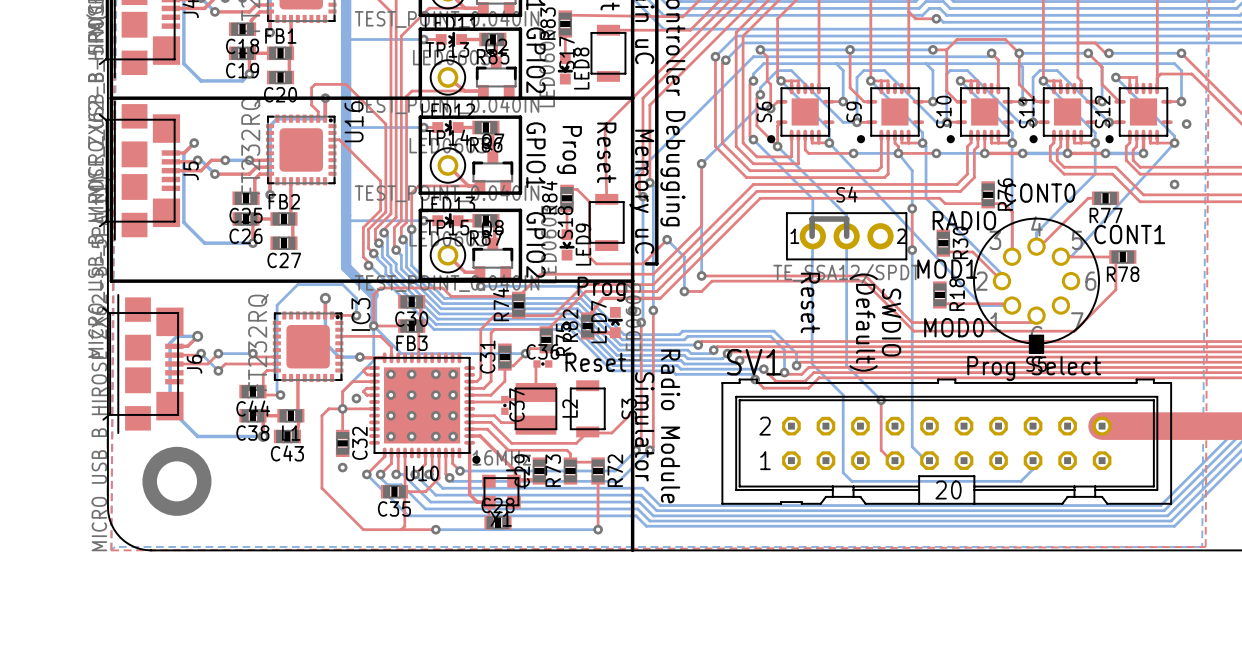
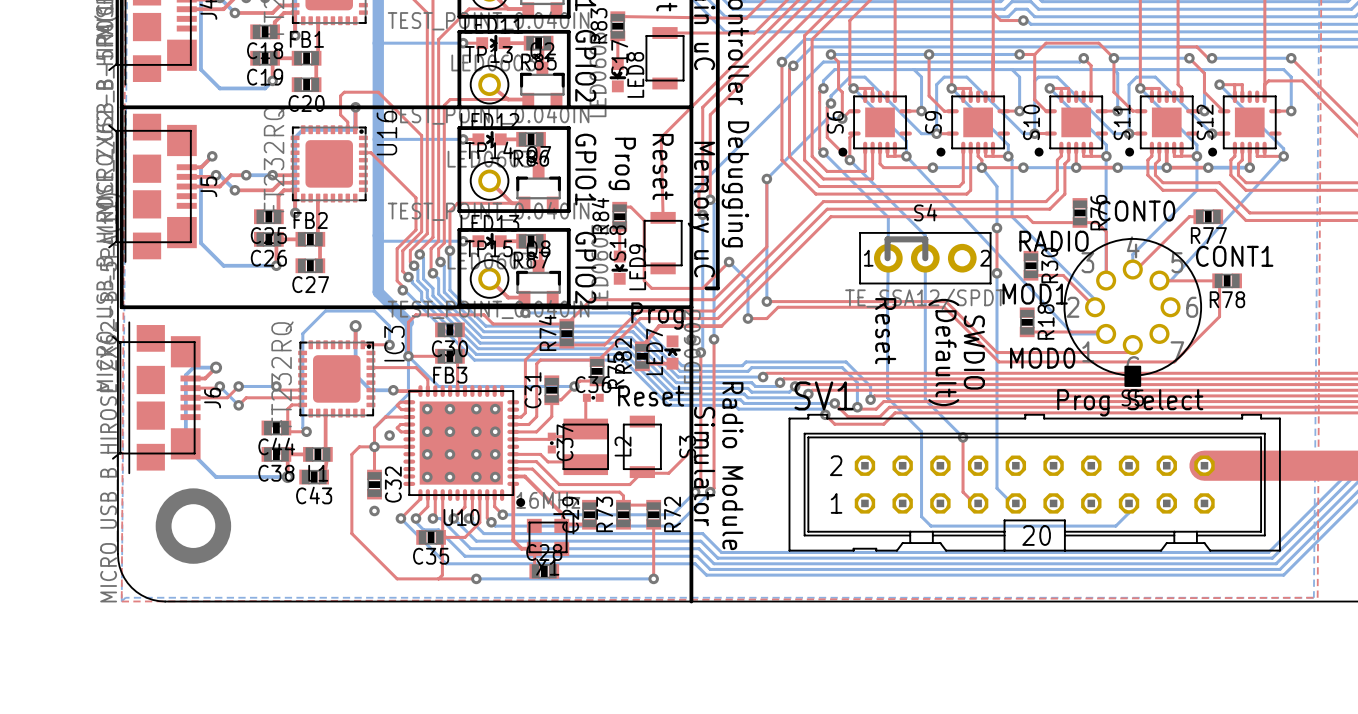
via: (1186, 124) -> none
via: (1174, 184) -> none

